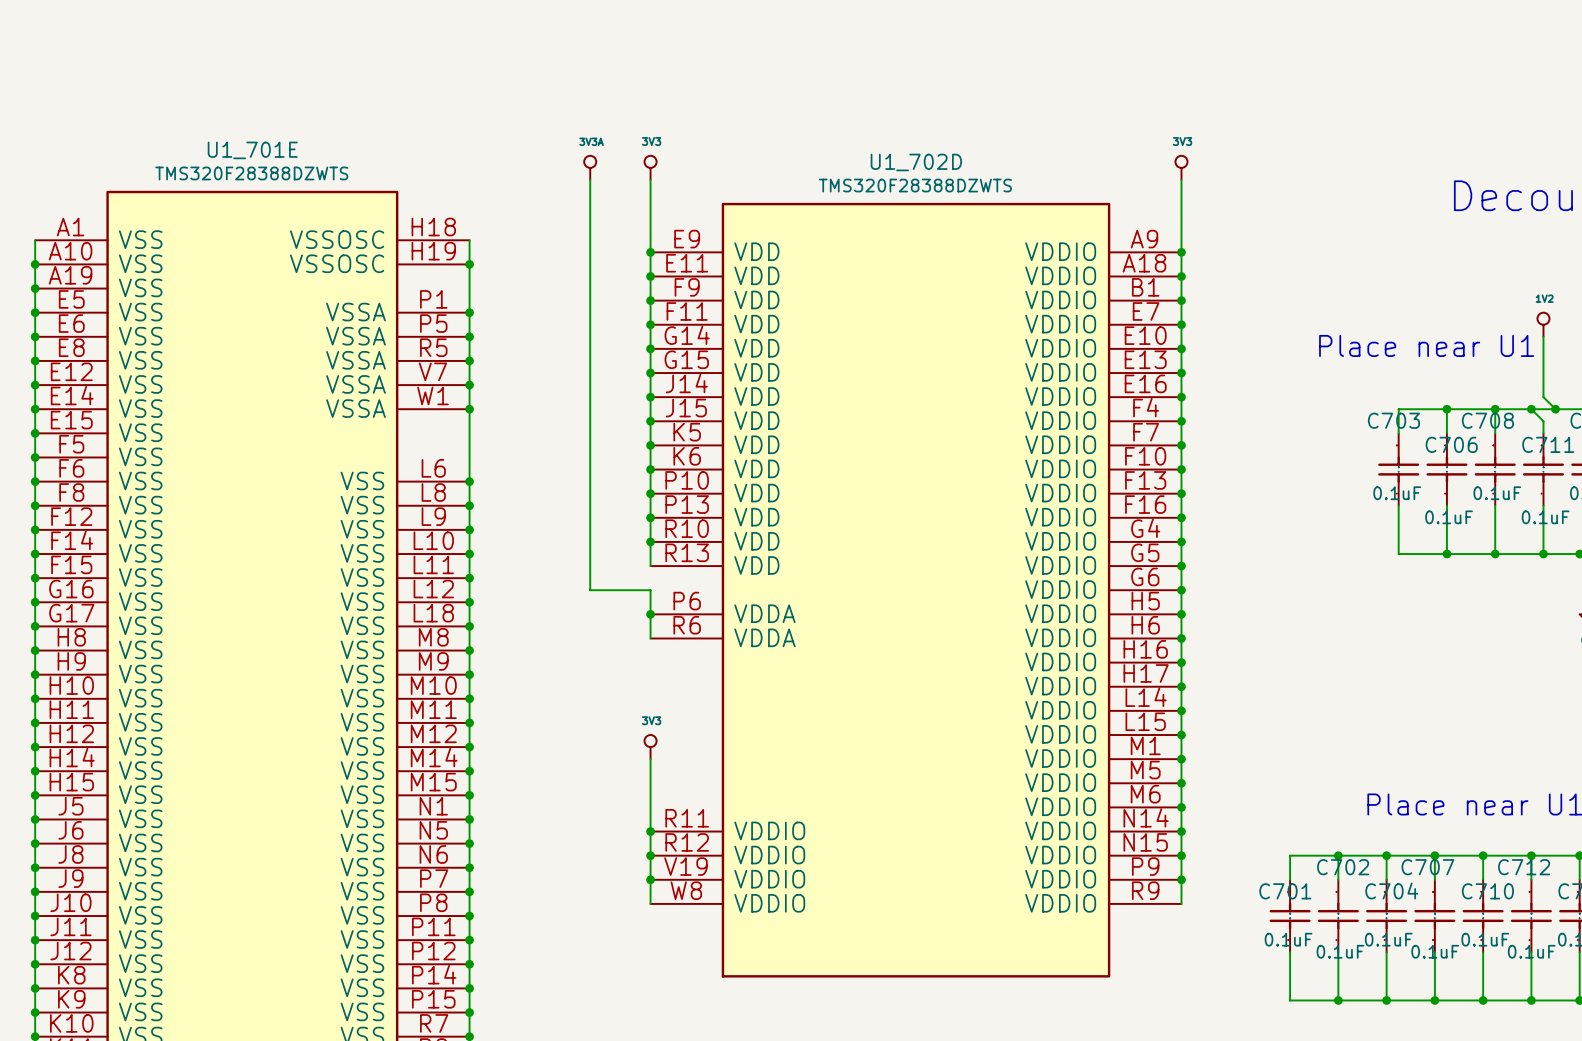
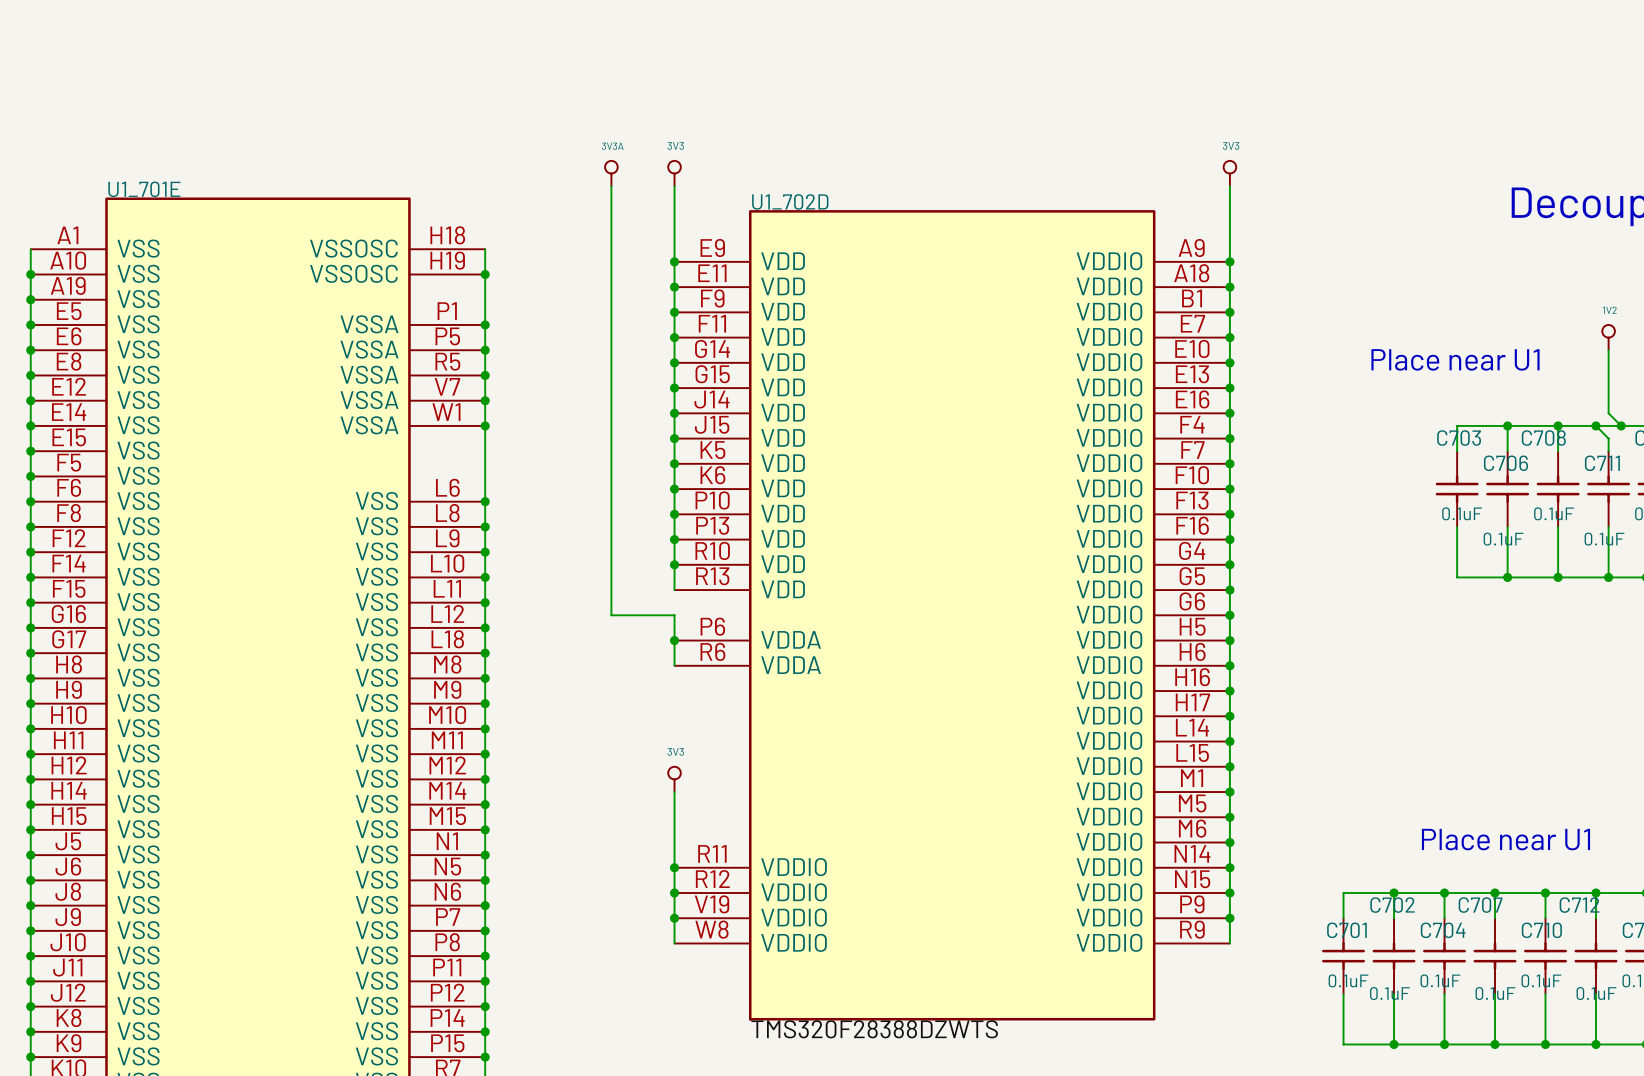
U1_701E name position: U1_701E (252, 150) -> U1_701E (144, 189)
U1_702D name position: U1_702D (916, 162) -> U1_702D (790, 201)
U1_701E value: TMS320F28388DZWTS (251, 173) -> none
U1_702D value: TMS320F28388DZWTS (915, 185) -> none
label: none -> TMS320F28388DZWTS (874, 1029)

